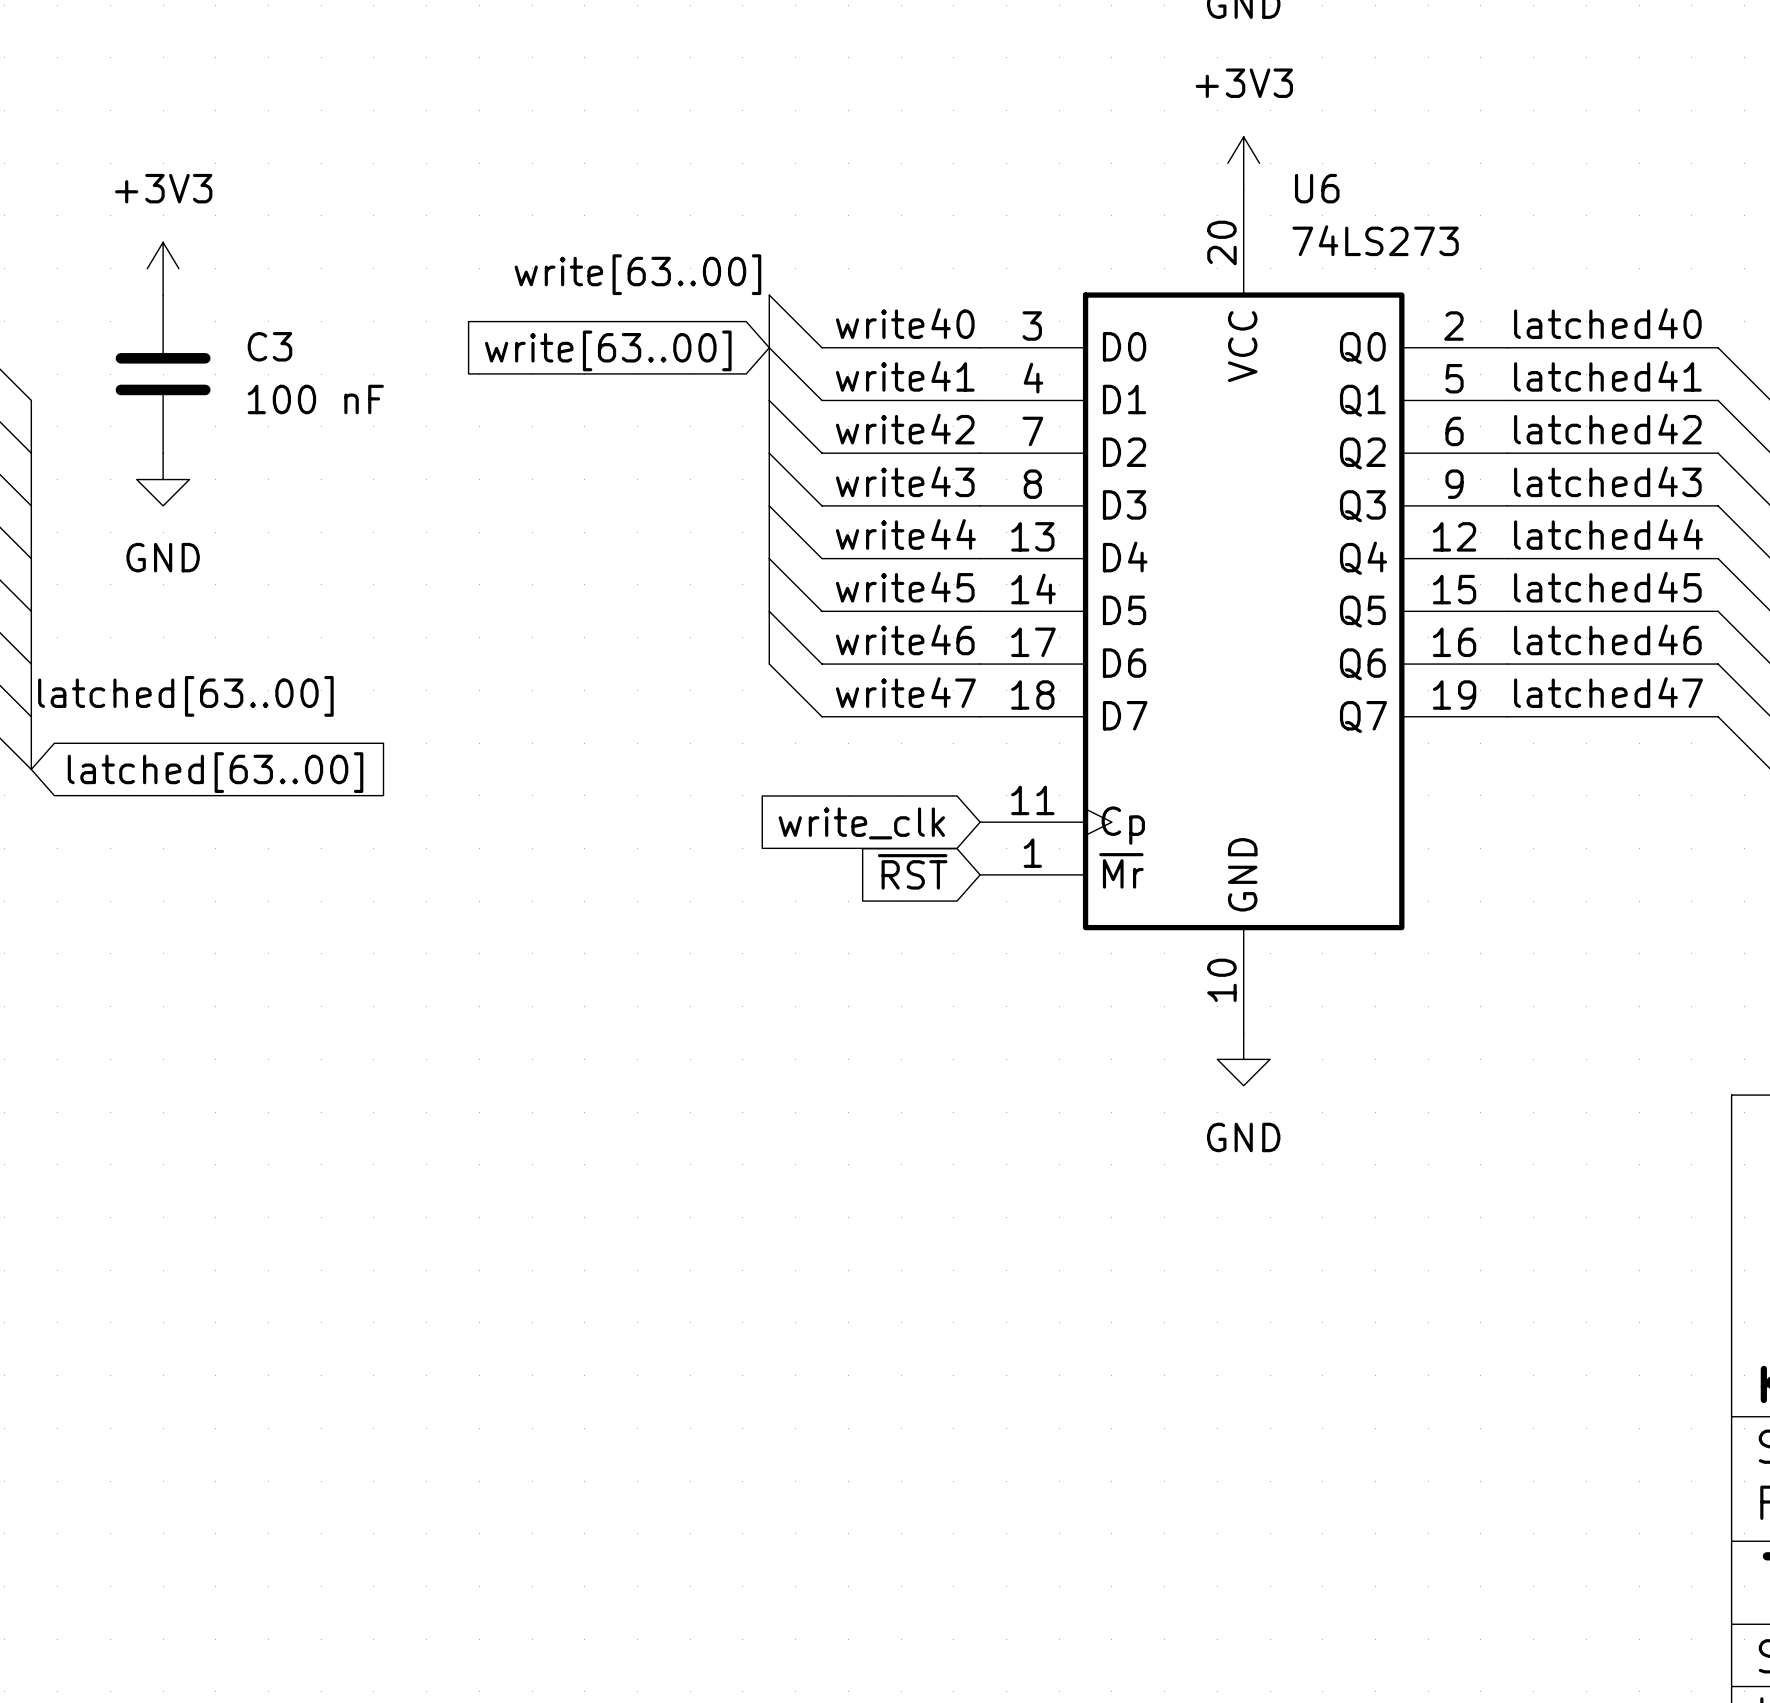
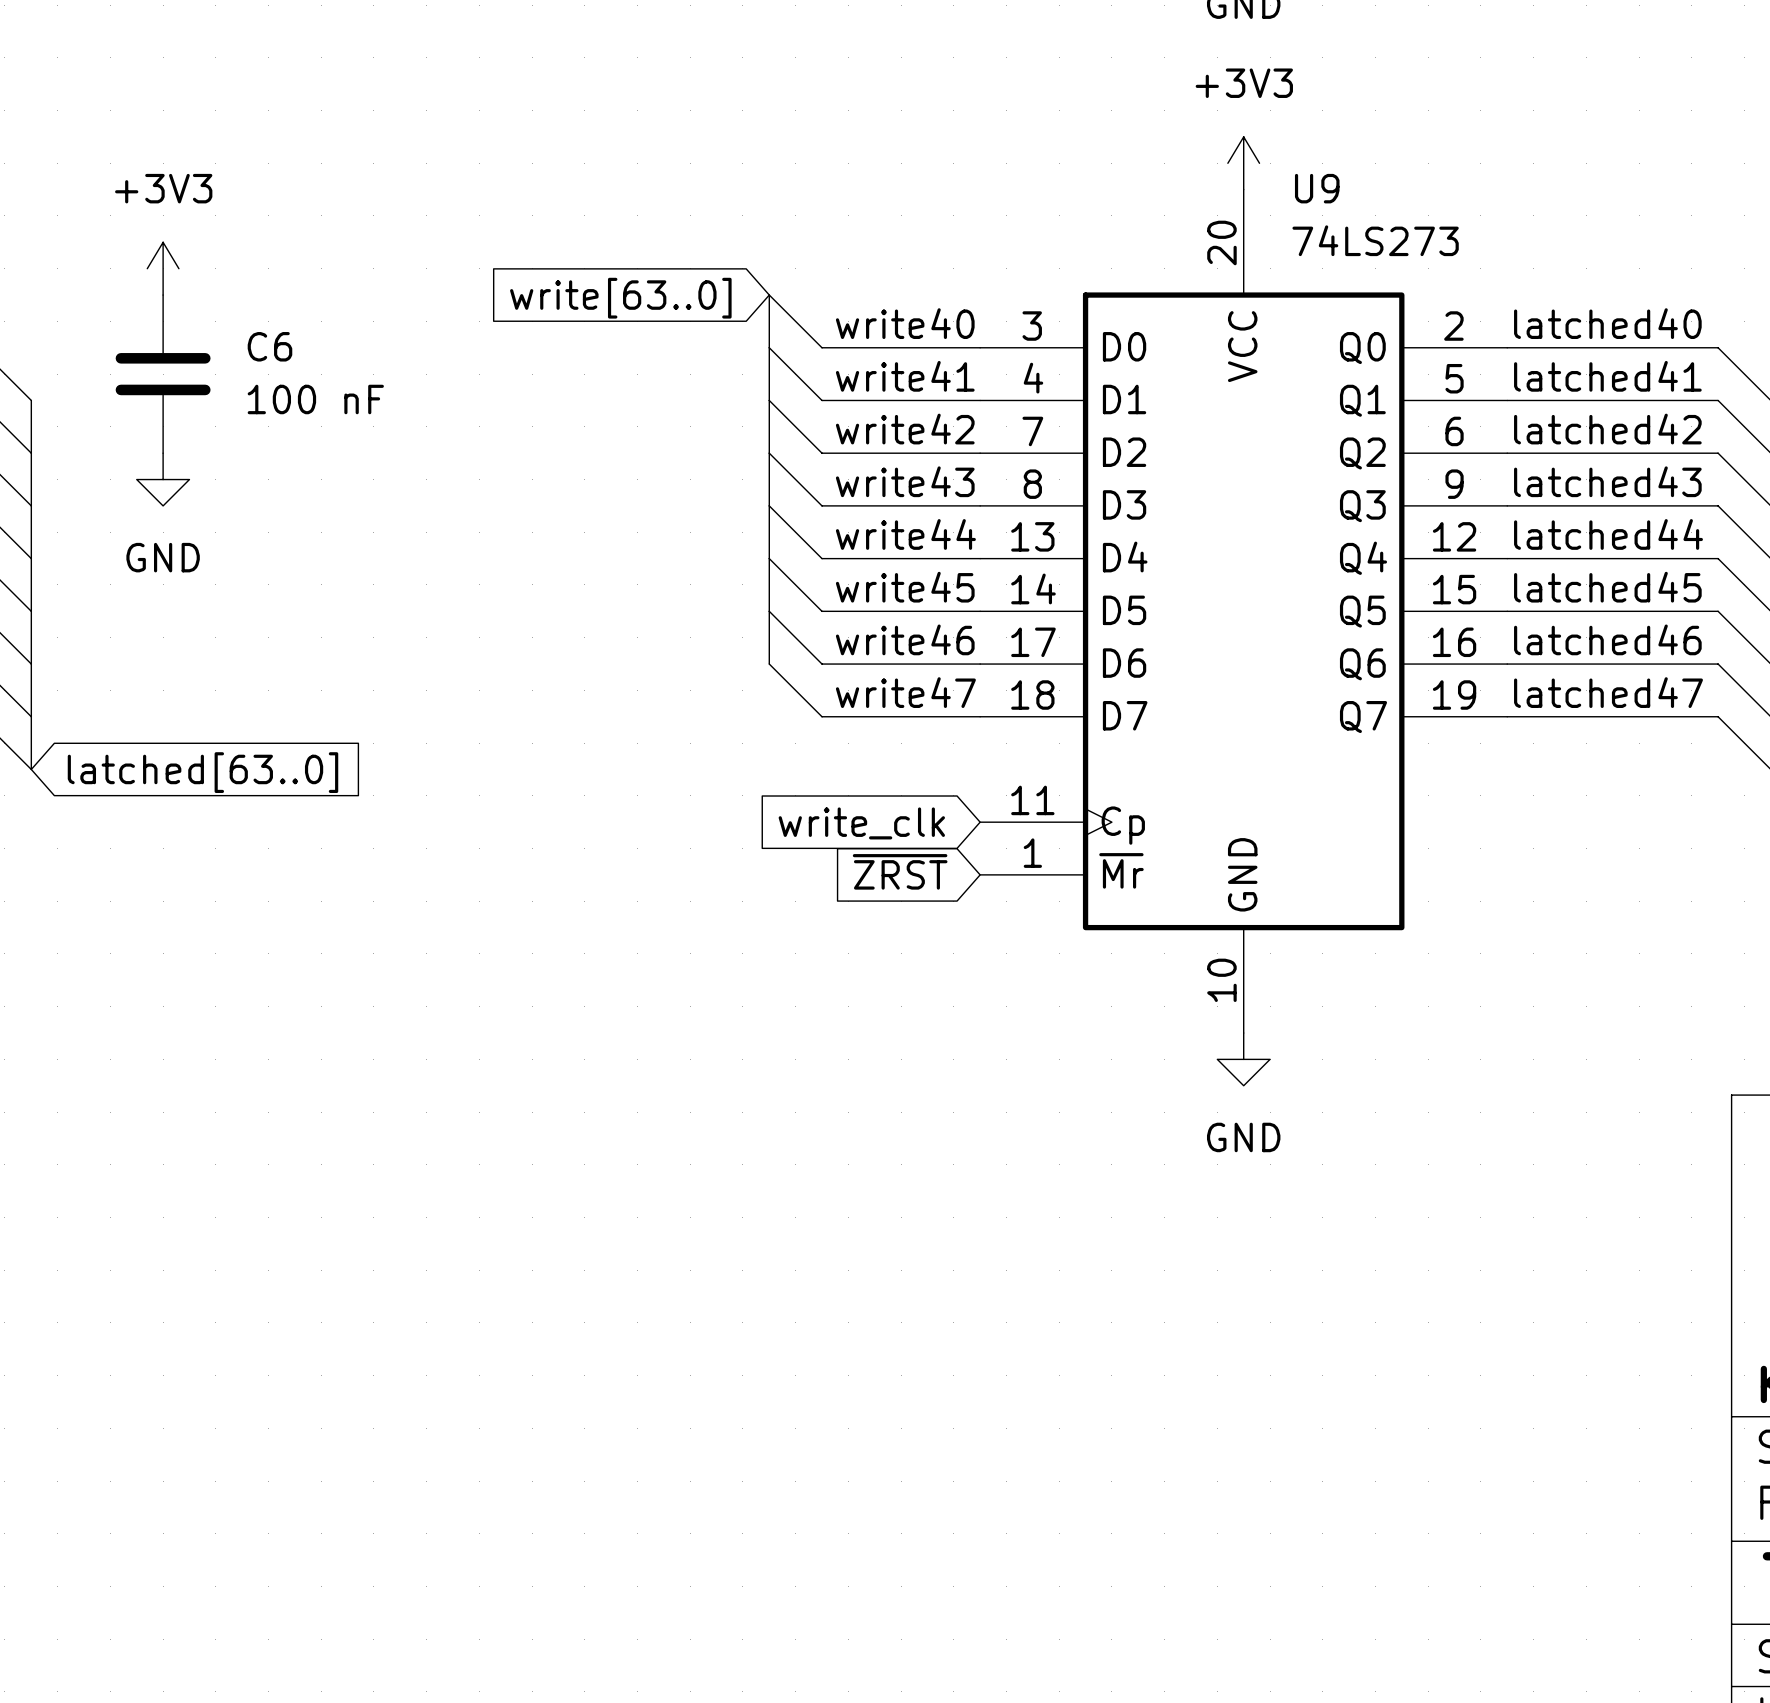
U6 name: U6 (1317, 188) -> U9 (1317, 188)
label: write[63..00] (637, 274) -> none
C3 name: C3 (269, 346) -> C6 (269, 346)
global label: write[63..00] (608, 350) -> write[63..0] (620, 298)
label: latched[63..00] (185, 696) -> none
global label: latched[63..00] (215, 772) -> latched[63..0] (202, 772)
global label: ~{RST} (912, 871) -> ~{ZRST} (900, 871)

